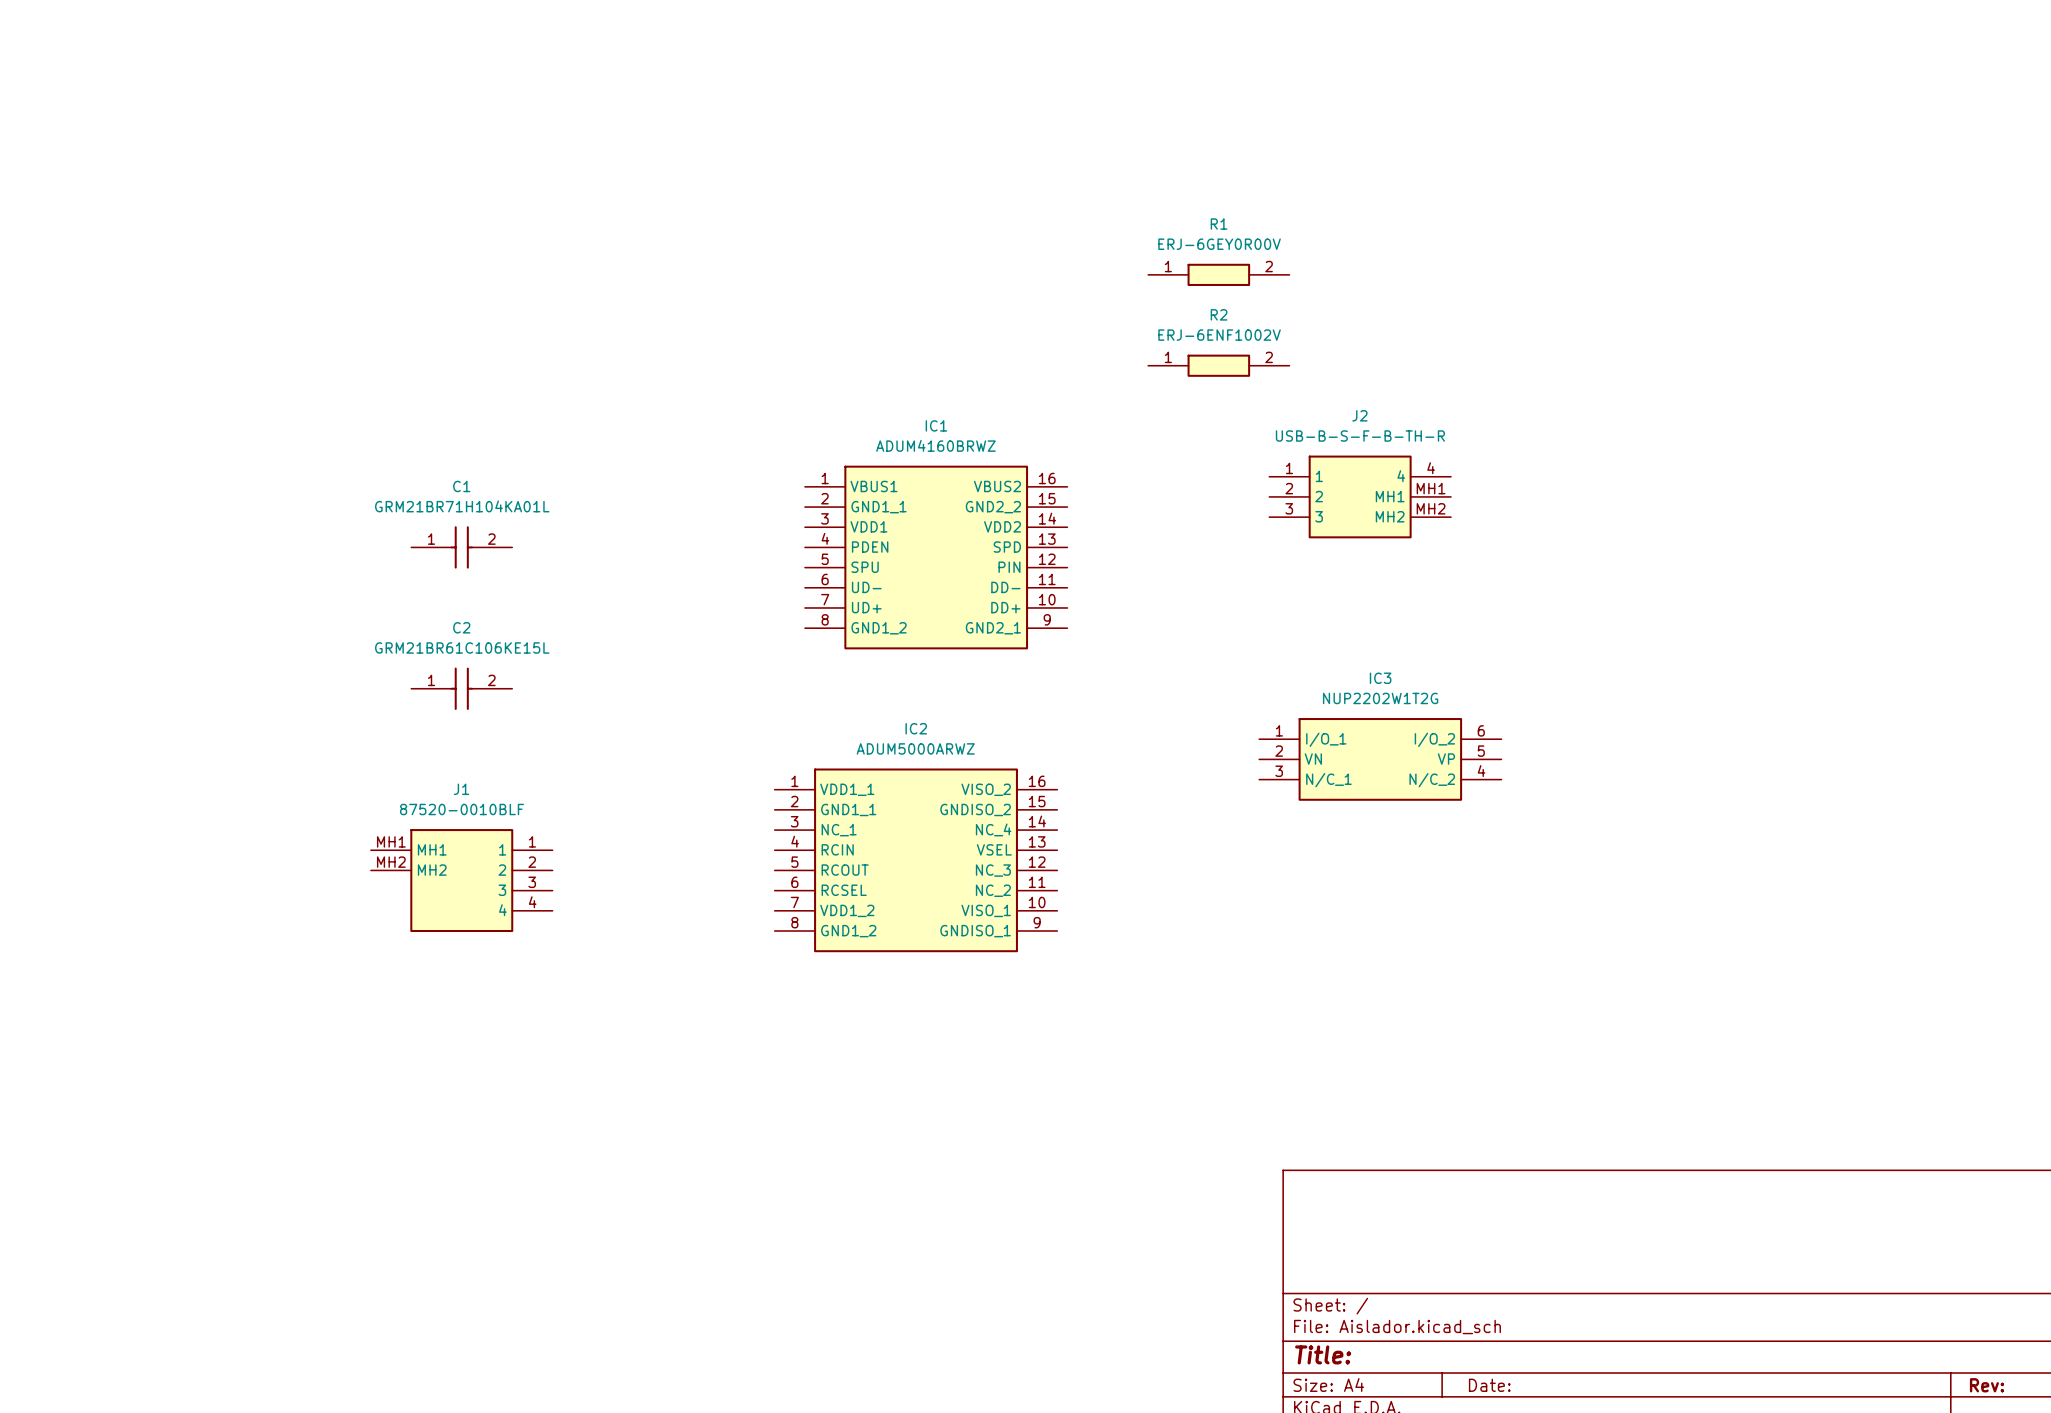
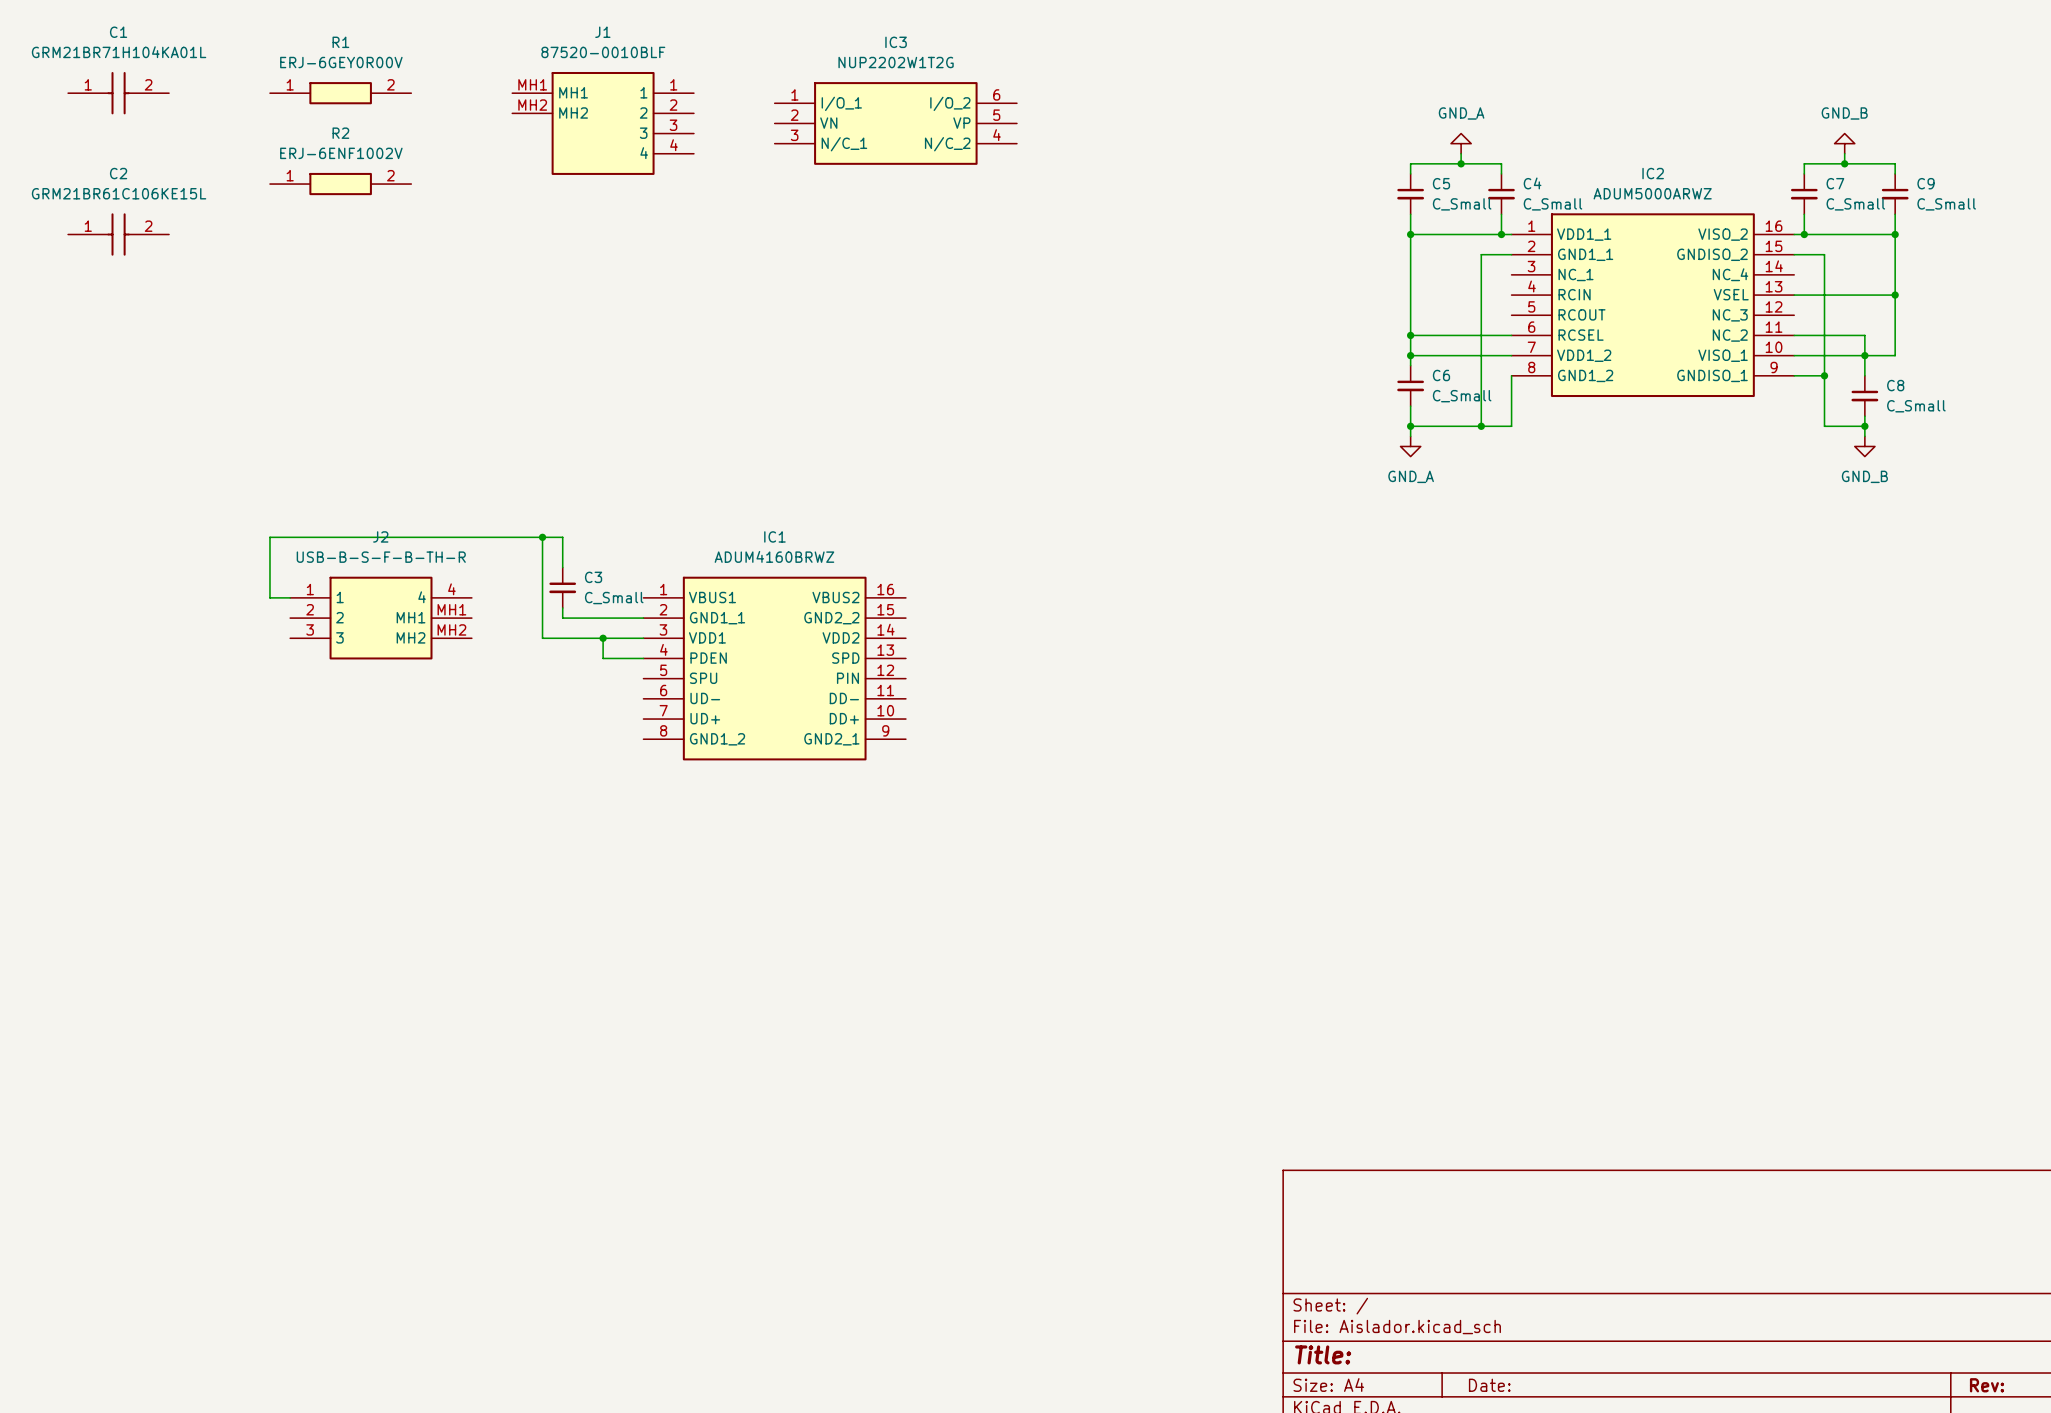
power symbol: none -> GND_A (1461, 143)
power symbol: none -> GND_B (1844, 143)
wire: none -> (1461, 153) (1461, 163)
wire: none -> (1844, 153) (1844, 163)
junction: none -> (1461, 163)
junction: none -> (1844, 163)
wire: none -> (1410, 173) (1410, 163) (1501, 163) (1501, 173)
wire: none -> (1804, 173) (1804, 163) (1895, 163) (1895, 173)
C5: none -> C_Small (1410, 194)
C4: none -> C_Small (1501, 194)
C7: none -> C_Small (1804, 194)
C9: none -> C_Small (1895, 194)
wire: none -> (1410, 214) (1410, 365)
wire: none -> (1501, 214) (1501, 234)
wire: none -> (1804, 214) (1804, 234)
wire: none -> (1895, 214) (1895, 355) (1794, 355)
wire: none -> (1410, 234) (1511, 234)
junction: none -> (1410, 234)
junction: none -> (1501, 234)
wire: none -> (1794, 234) (1895, 234)
junction: none -> (1804, 234)
junction: none -> (1895, 234)
wire: none -> (1511, 254) (1481, 254) (1481, 426)
wire: none -> (1794, 254) (1824, 254) (1824, 426) (1864, 426)
R1 position: (1218, 274) -> (340, 93)
wire: none -> (1794, 295) (1895, 295)
junction: none -> (1895, 295)
wire: none -> (1410, 335) (1511, 335)
junction: none -> (1410, 335)
wire: none -> (1794, 335) (1864, 335) (1864, 375)
wire: none -> (1410, 355) (1511, 355)
junction: none -> (1410, 355)
junction: none -> (1864, 355)
R2 position: (1218, 365) -> (340, 184)
wire: none -> (1511, 375) (1511, 426) (1410, 426)
wire: none -> (1794, 375) (1824, 375)
junction: none -> (1824, 375)
C6: none -> C_Small (1410, 385)
C8: none -> C_Small (1864, 396)
wire: none -> (1410, 406) (1410, 436)
wire: none -> (1864, 416) (1864, 436)
junction: none -> (1410, 426)
junction: none -> (1481, 426)
junction: none -> (1864, 426)
power symbol: none -> GND_A (1410, 446)
power symbol: none -> GND_B (1864, 446)
J2 position: (1360, 496) -> (381, 618)
wire: none -> (542, 537) (542, 638) (643, 638)
junction: none -> (542, 537)
C1 position: (461, 547) -> (118, 93)
IC1 position: (936, 557) -> (774, 668)
wire: none -> (562, 567) (562, 537) (269, 537) (269, 597) (290, 597)
C3: none -> C_Small (562, 587)
wire: none -> (562, 607) (562, 618) (643, 618)
wire: none -> (603, 638) (603, 658) (643, 658)
junction: none -> (603, 638)
C2 position: (461, 688) -> (118, 234)
IC3 position: (1380, 759) -> (895, 123)
IC2 position: (916, 860) -> (1652, 305)
J1 position: (461, 880) -> (603, 123)

